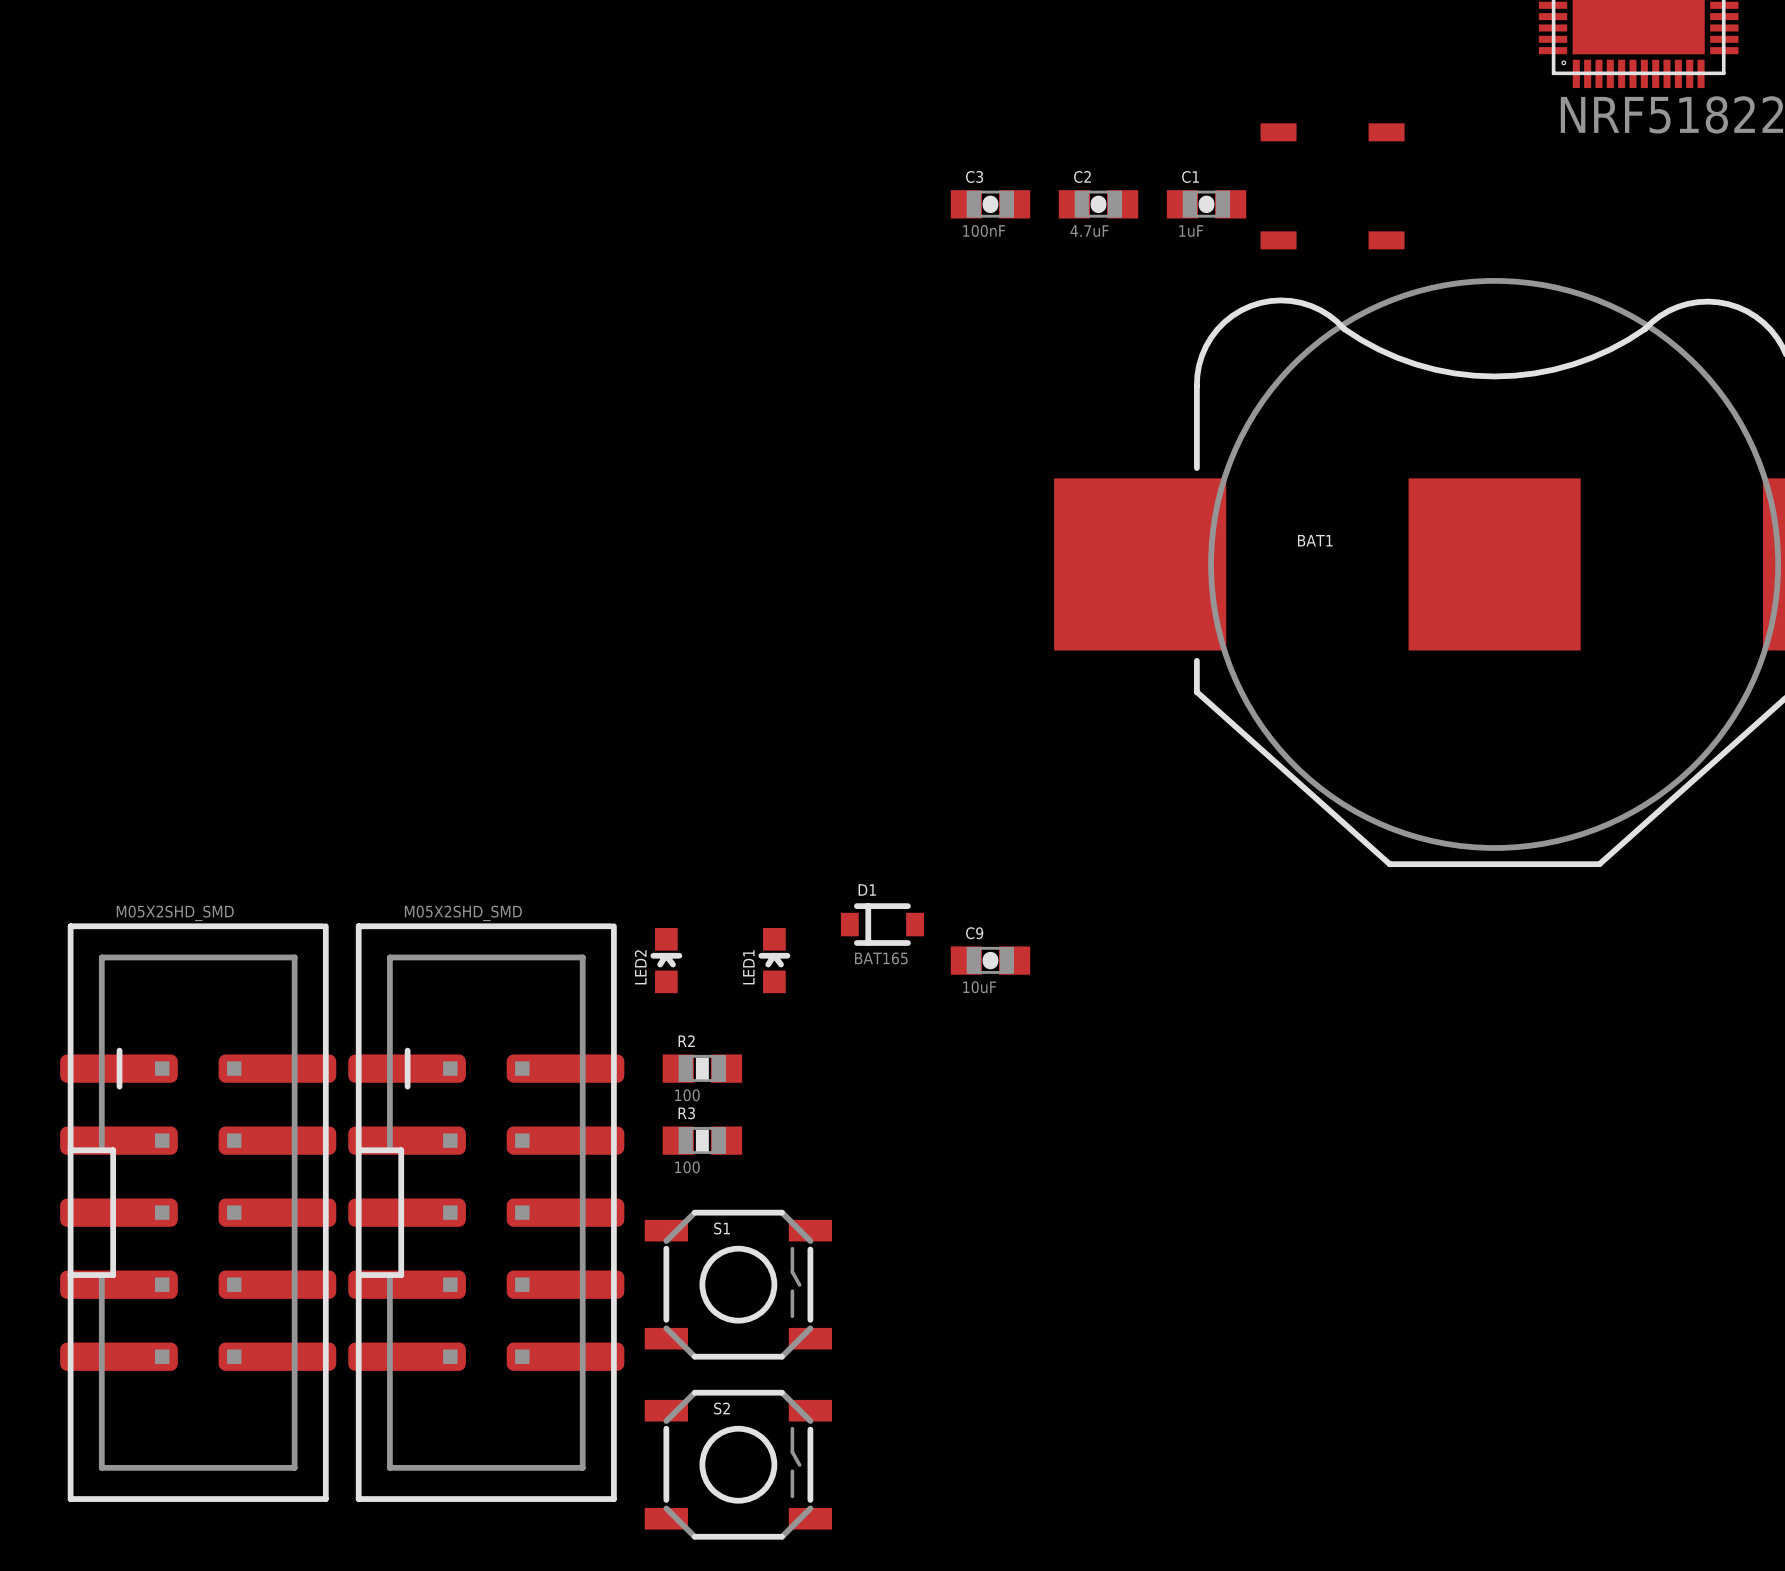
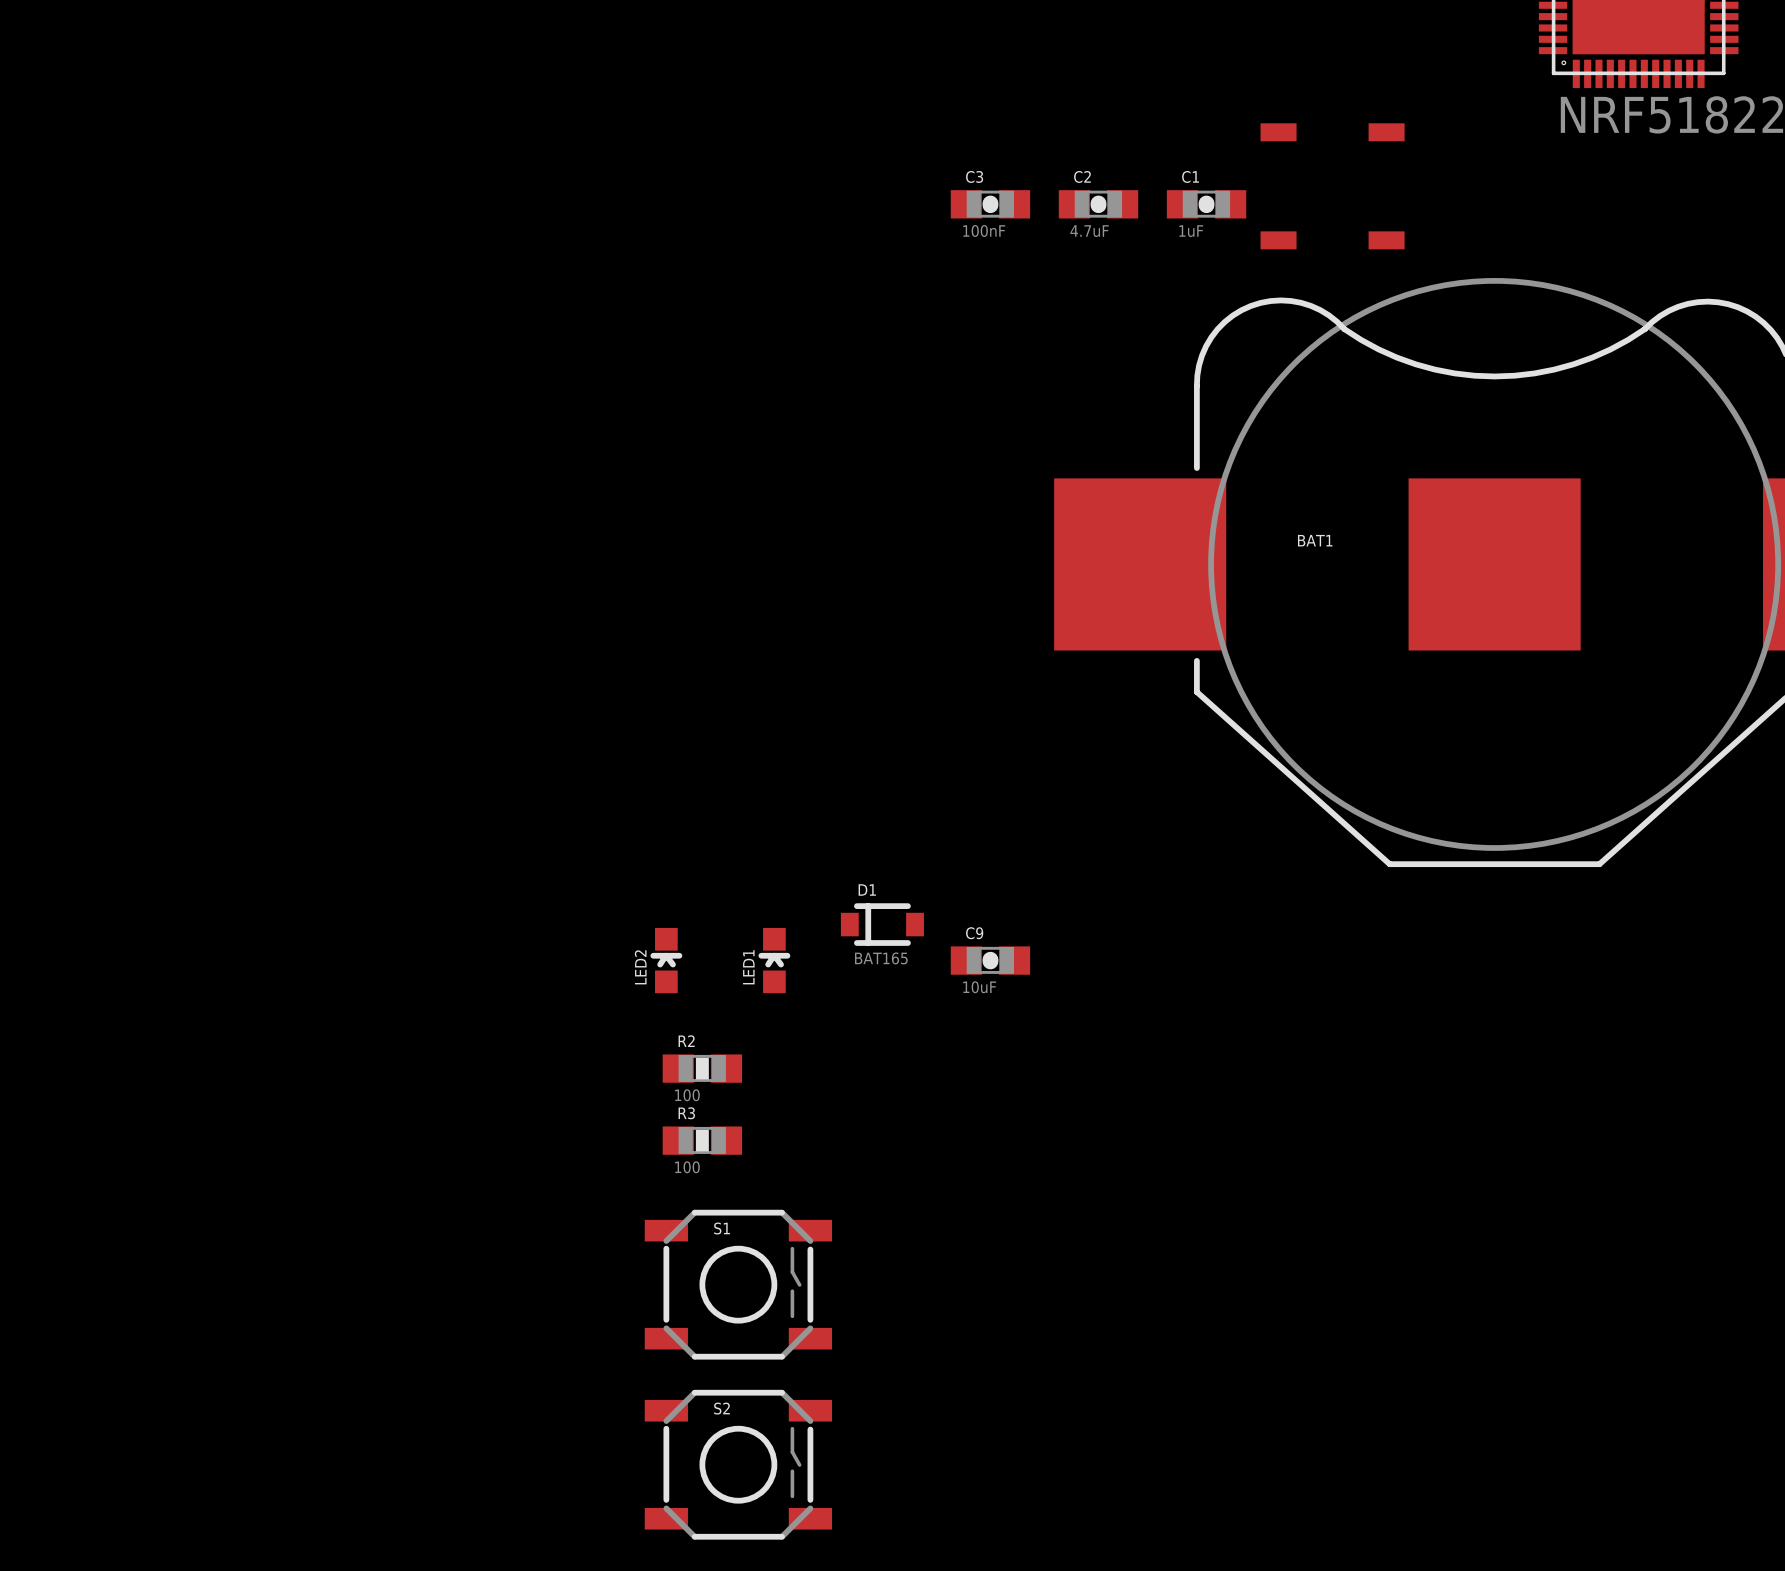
part: M05X2SHD_SMD (198, 1212) -> none
part: M05X2SHD_SMD (486, 1212) -> none

